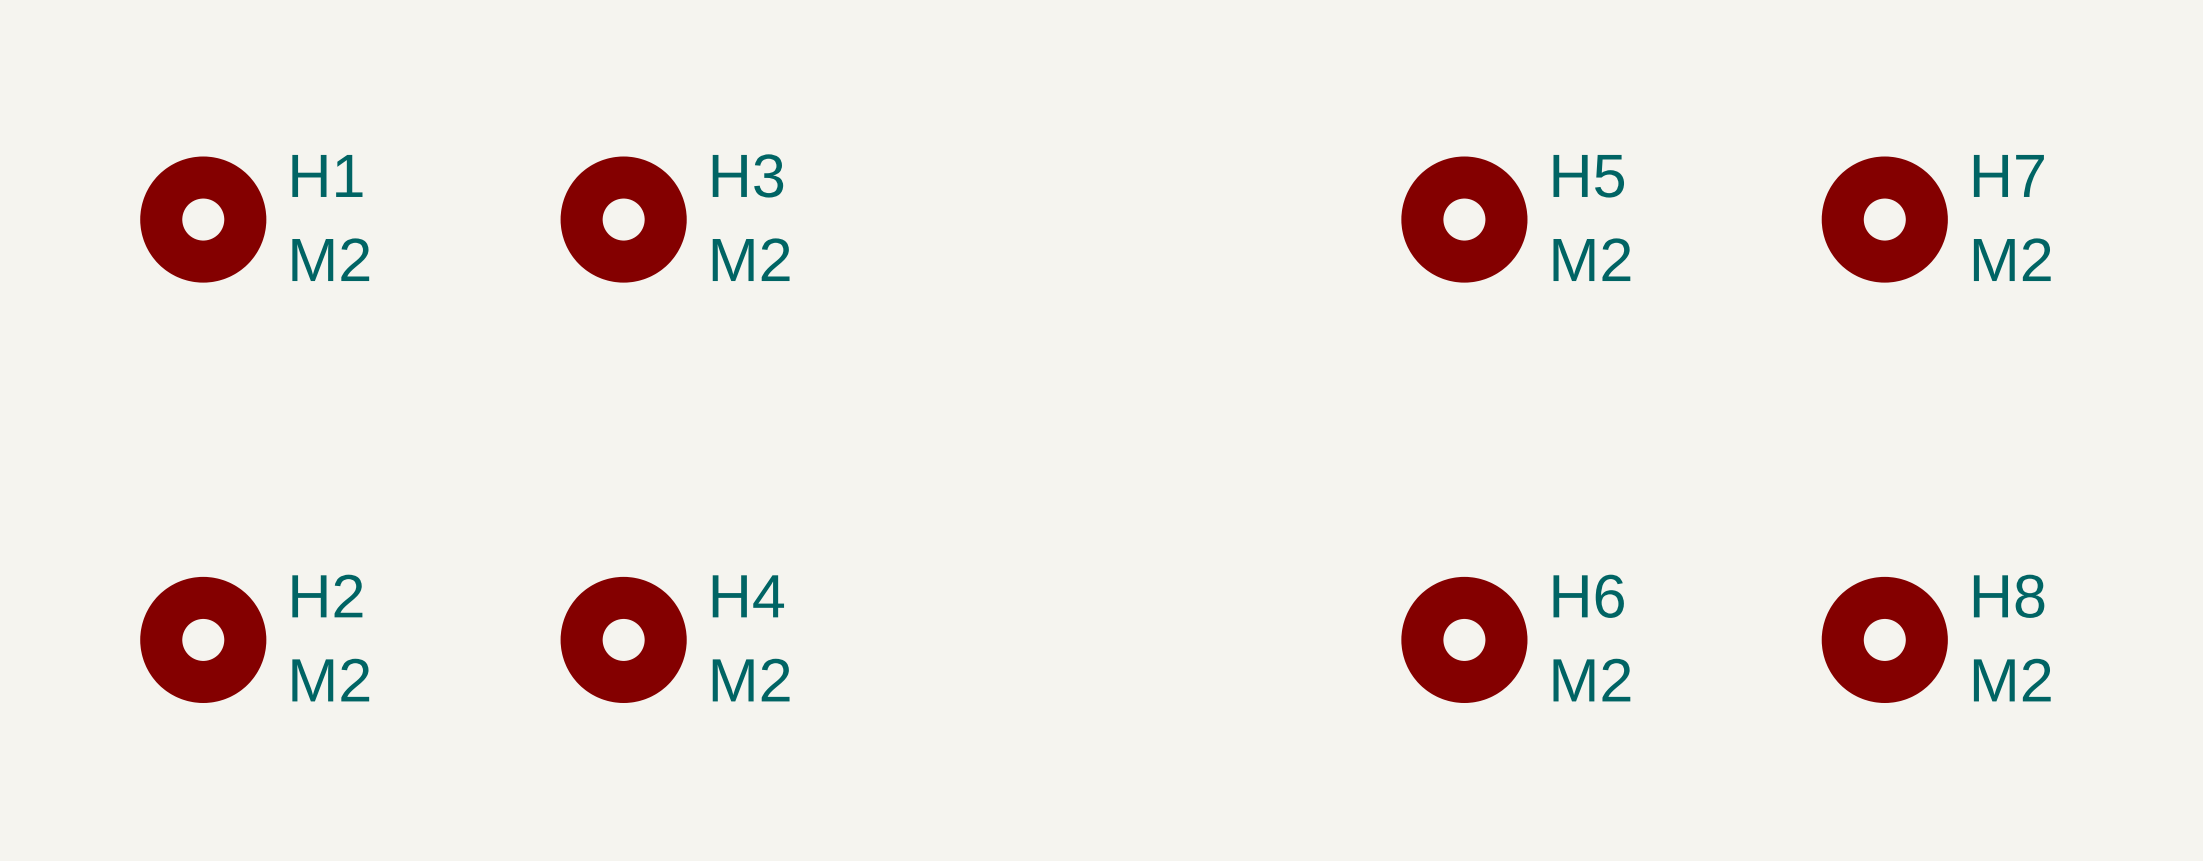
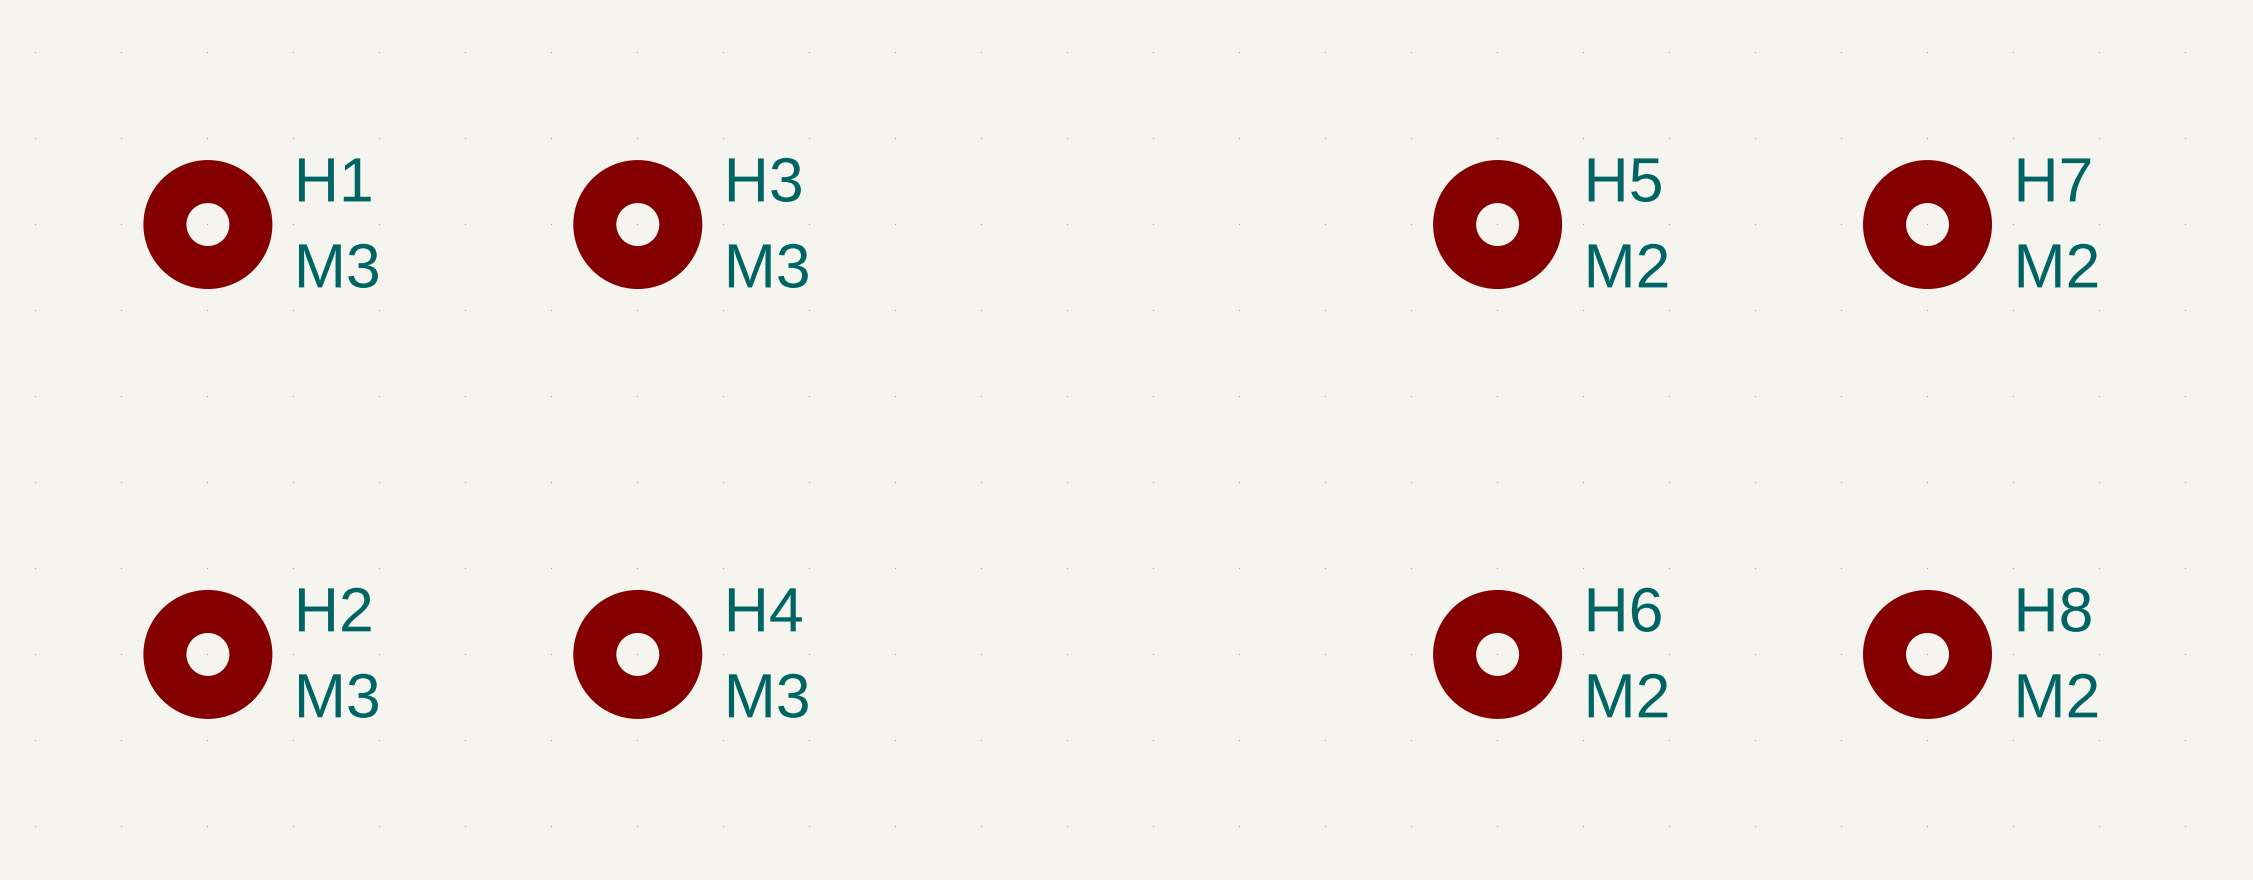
H1 value: M2 (330, 259) -> M3 (338, 265)
H3 value: M2 (751, 259) -> M3 (768, 265)
H2 value: M2 (330, 680) -> M3 (338, 695)
H4 value: M2 (751, 680) -> M3 (768, 695)

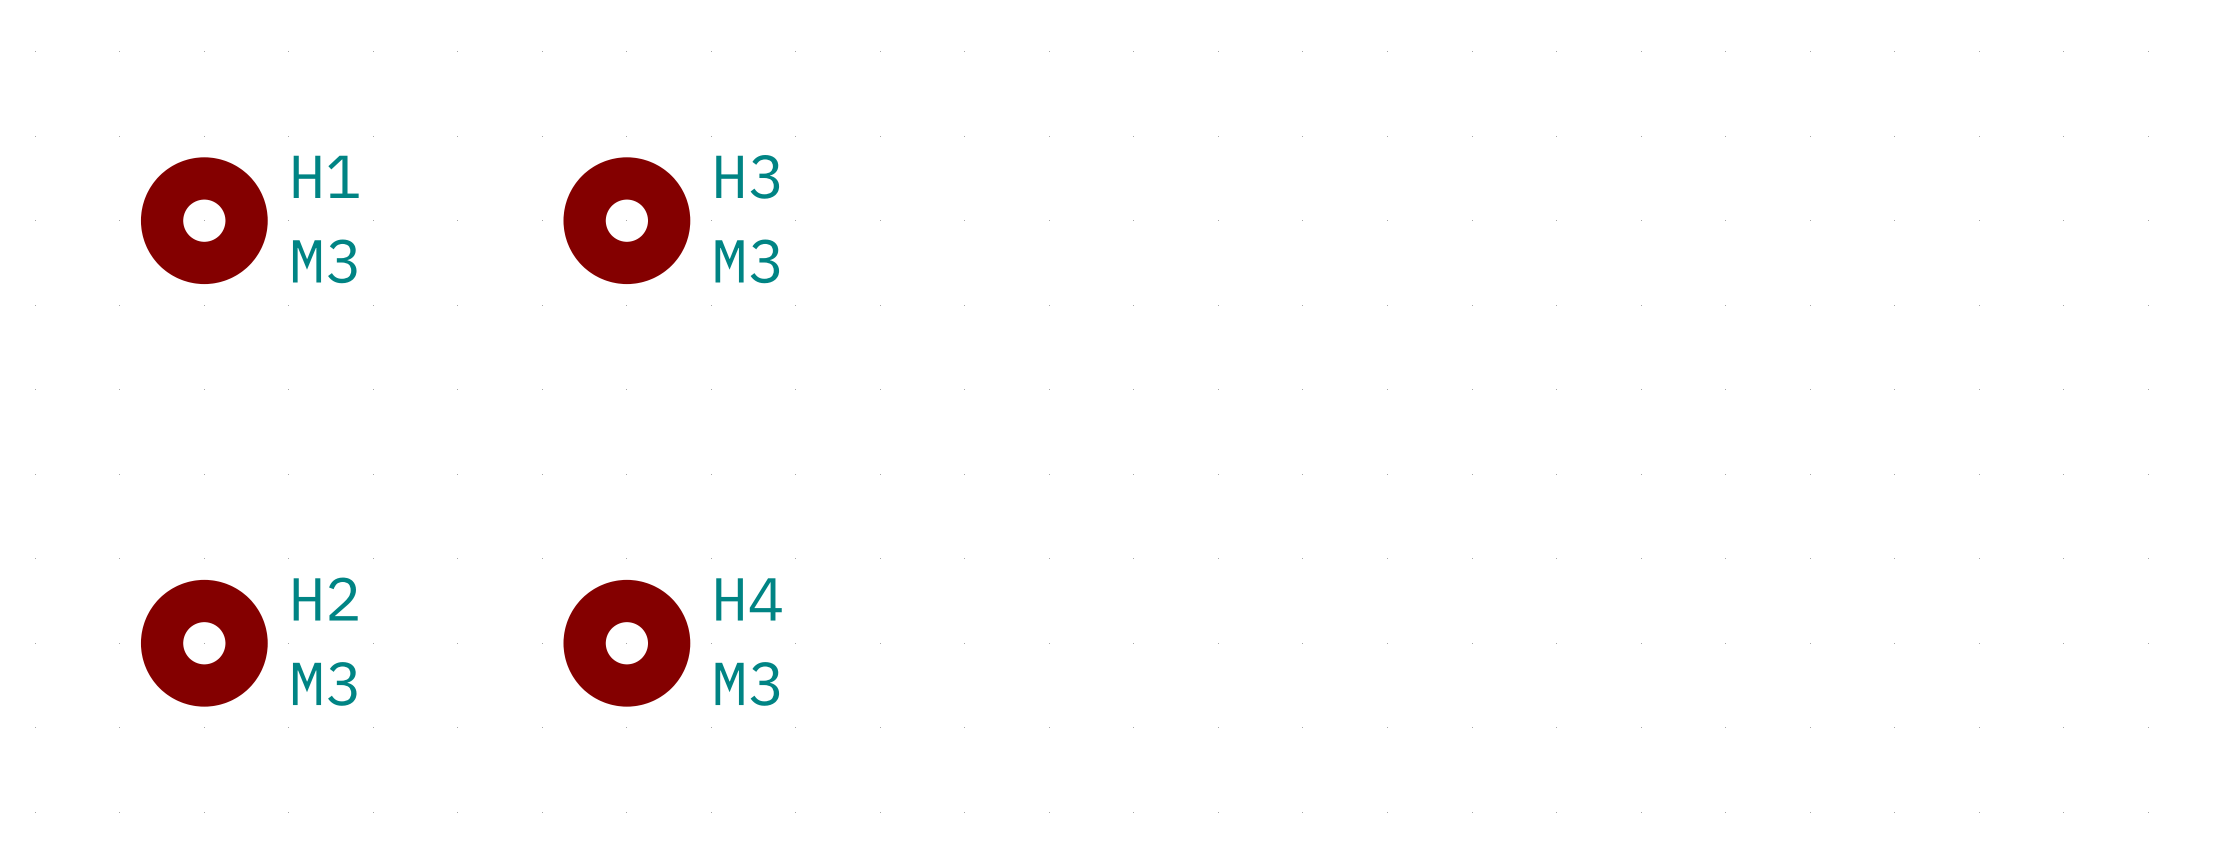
H5: M2 (1497, 224) -> none
H7: M2 (1927, 224) -> none
H6: M2 (1497, 654) -> none
H8: M2 (1927, 654) -> none

